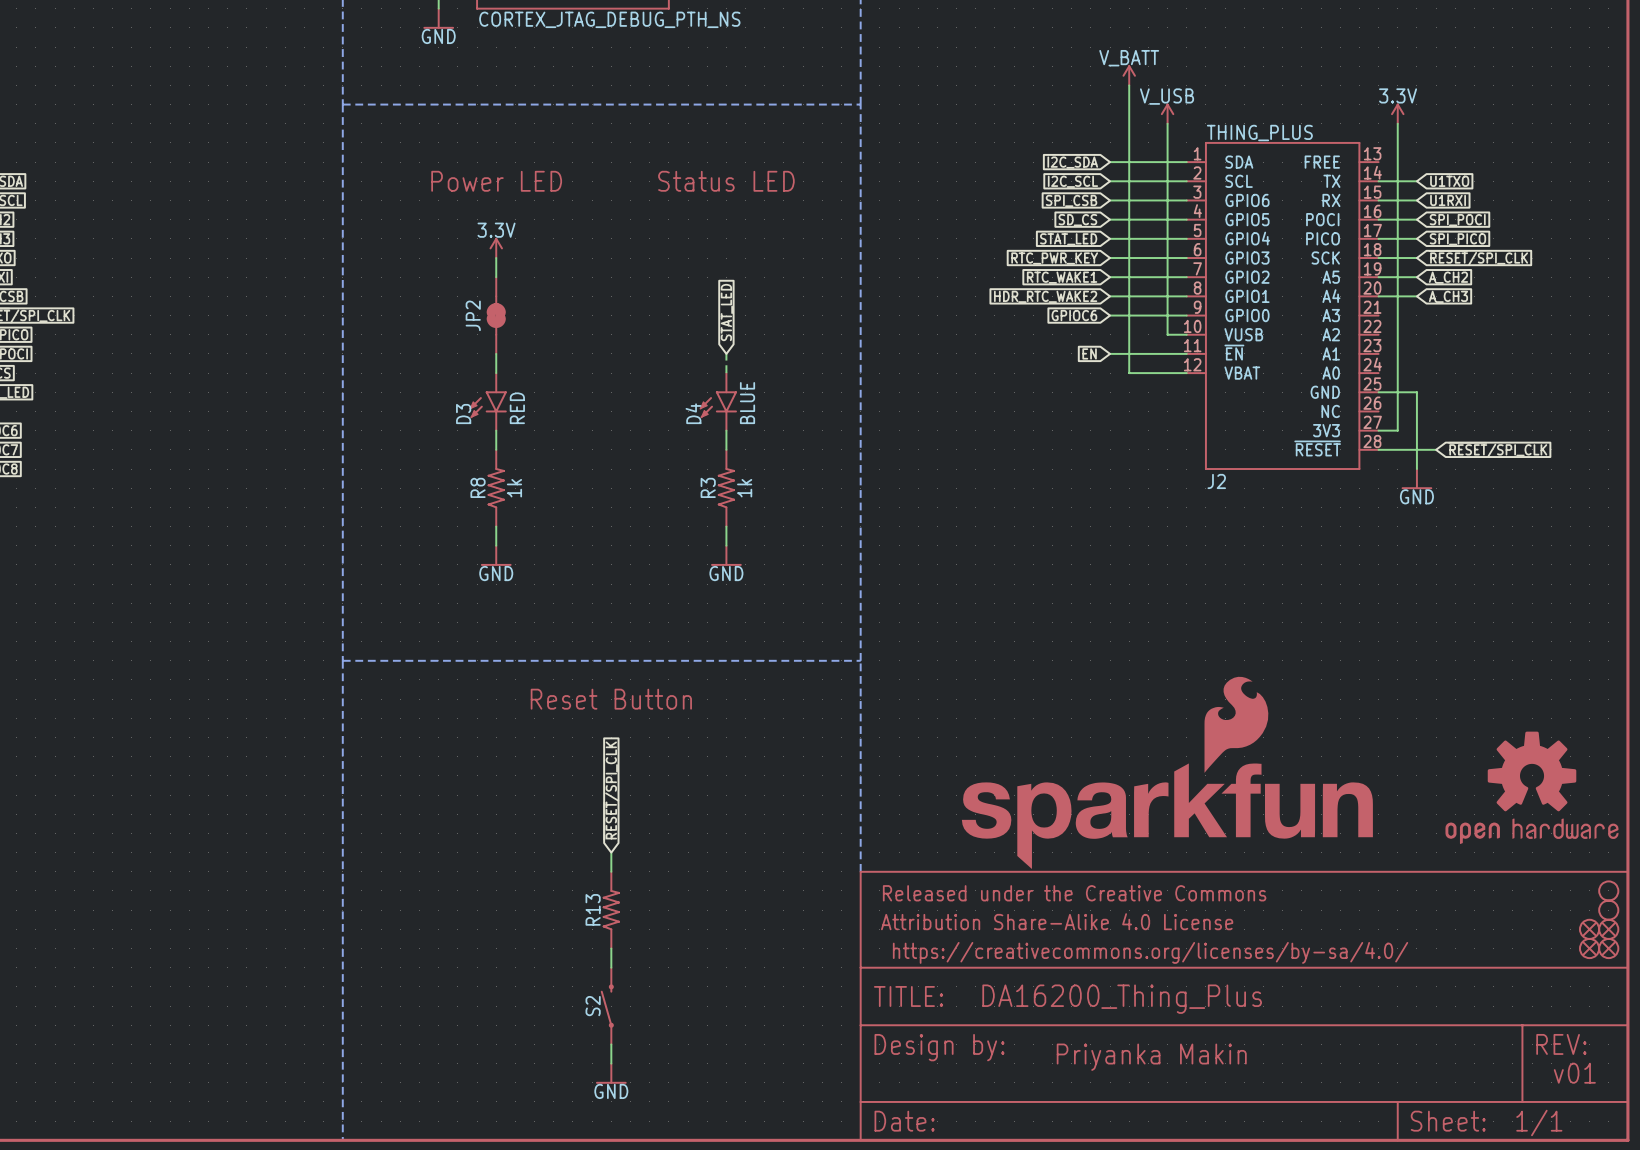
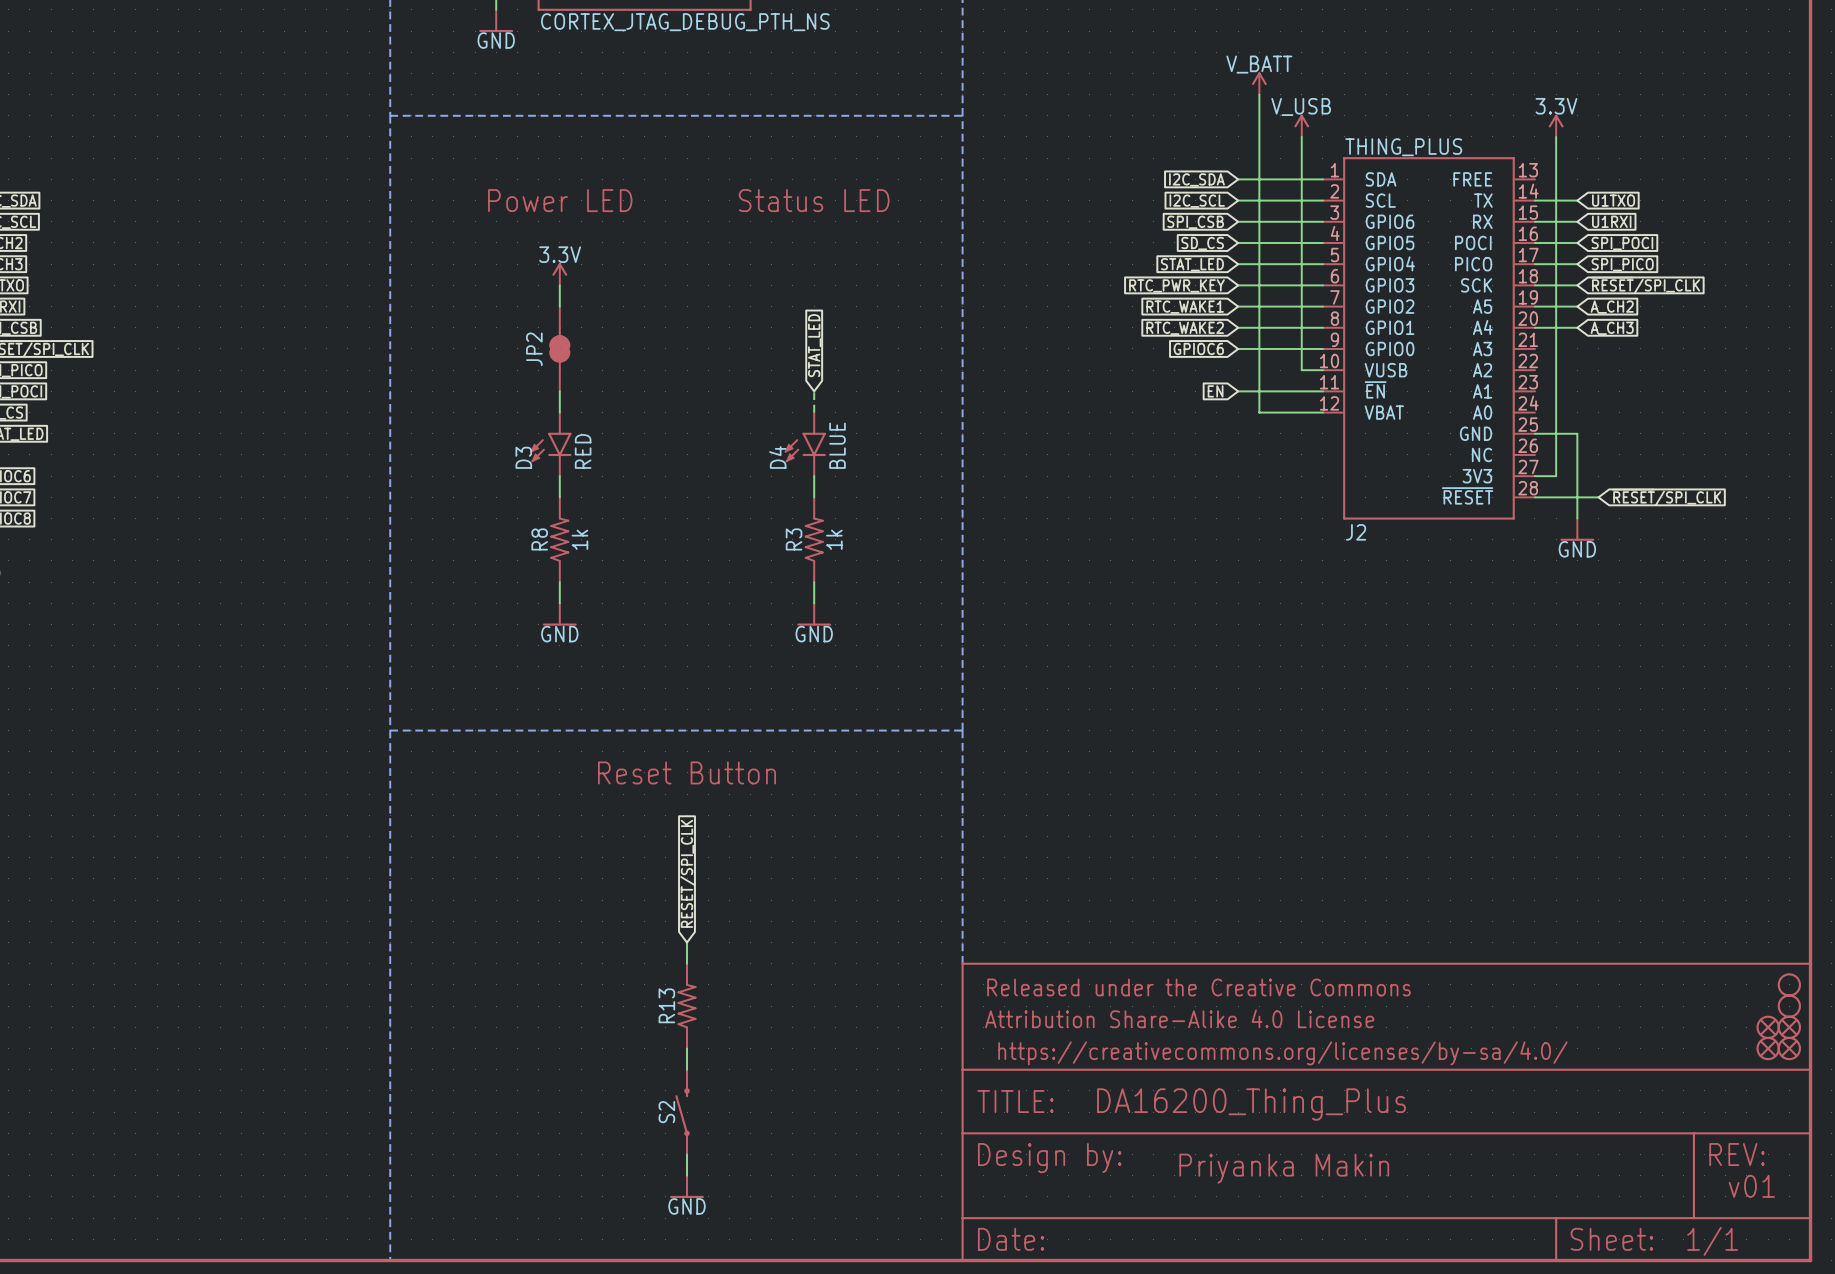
global label: HDR_RTC_WAKE2 (1045, 296) -> RTC_WAKE2 (1185, 328)
part: (1167, 772) -> none
part: (1531, 787) -> none

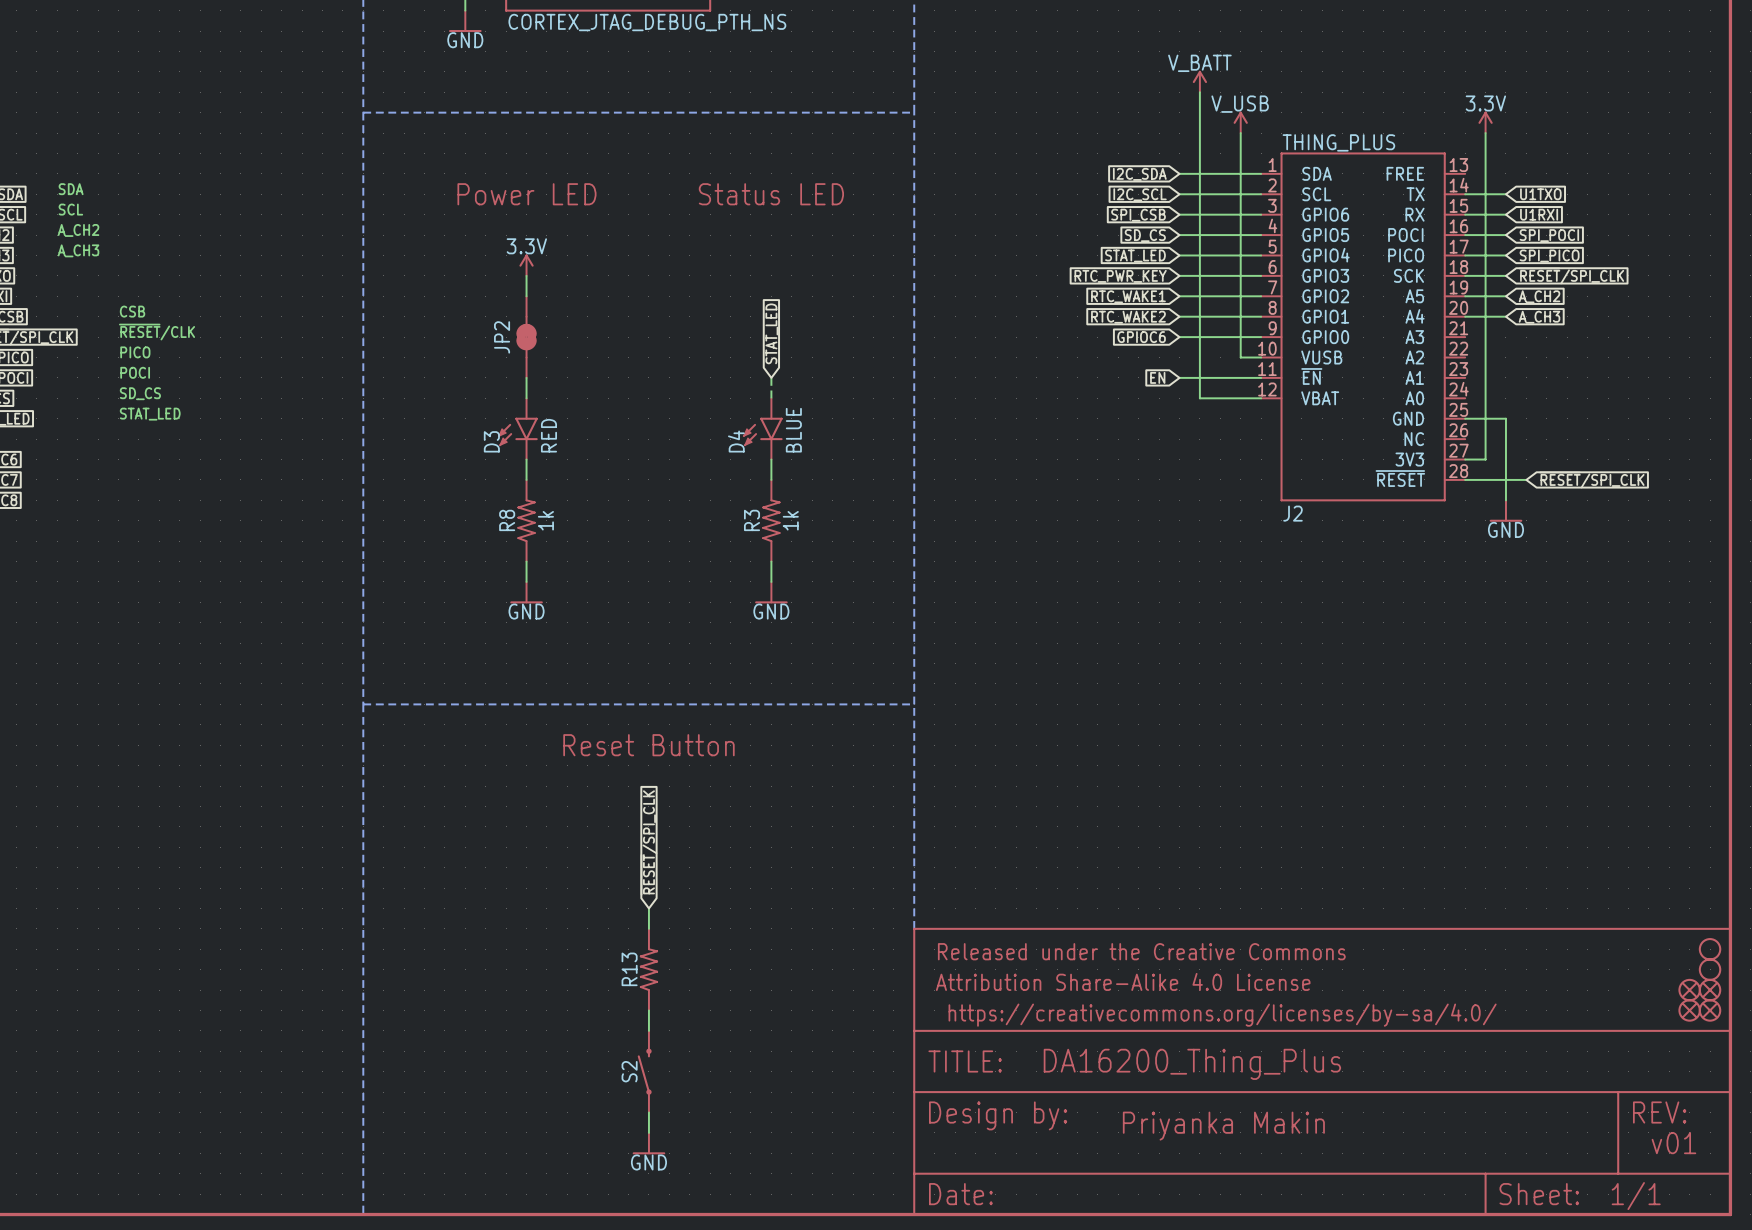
text: none -> SDA (71, 189)
text: none -> SCL (70, 209)
text: none -> A_CH2 (78, 230)
text: none -> A_CH3 (78, 250)
text: none -> CSB (132, 311)
text: none -> ~{RESET}/CLK (157, 332)
text: none -> PICO (135, 352)
text: none -> POCI (135, 372)
text: none -> SD_CS (140, 393)
text: none -> STAT_LED (150, 414)

